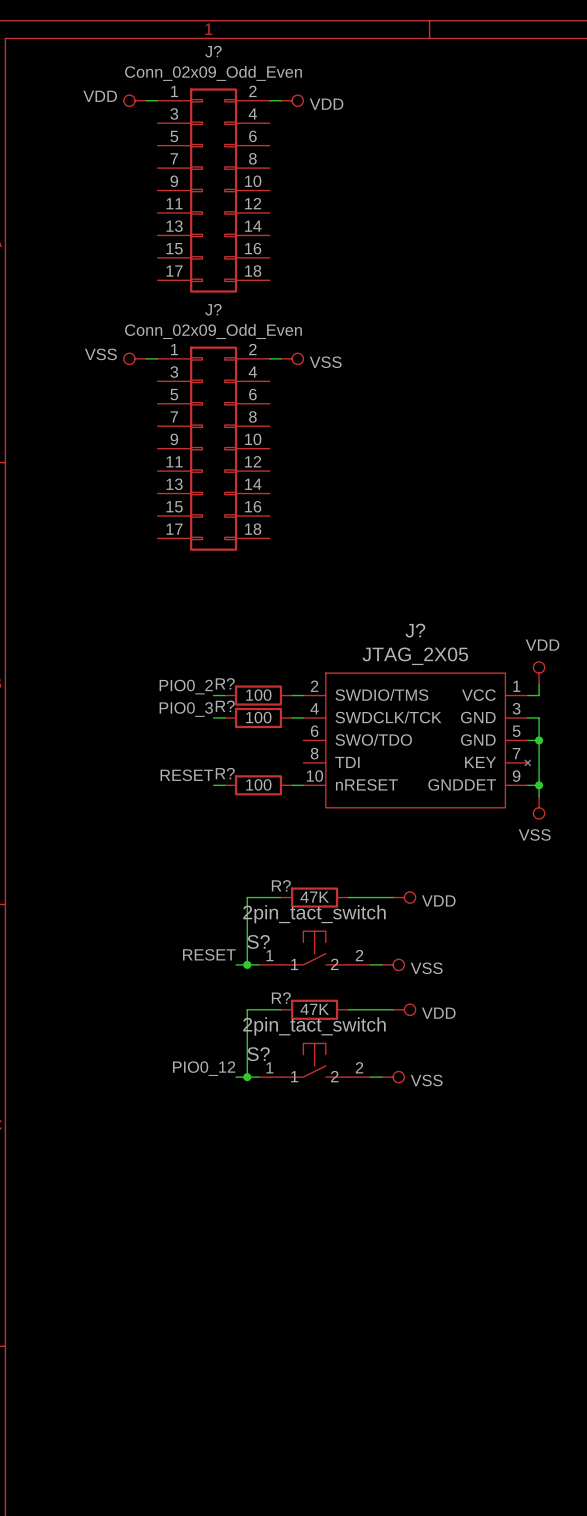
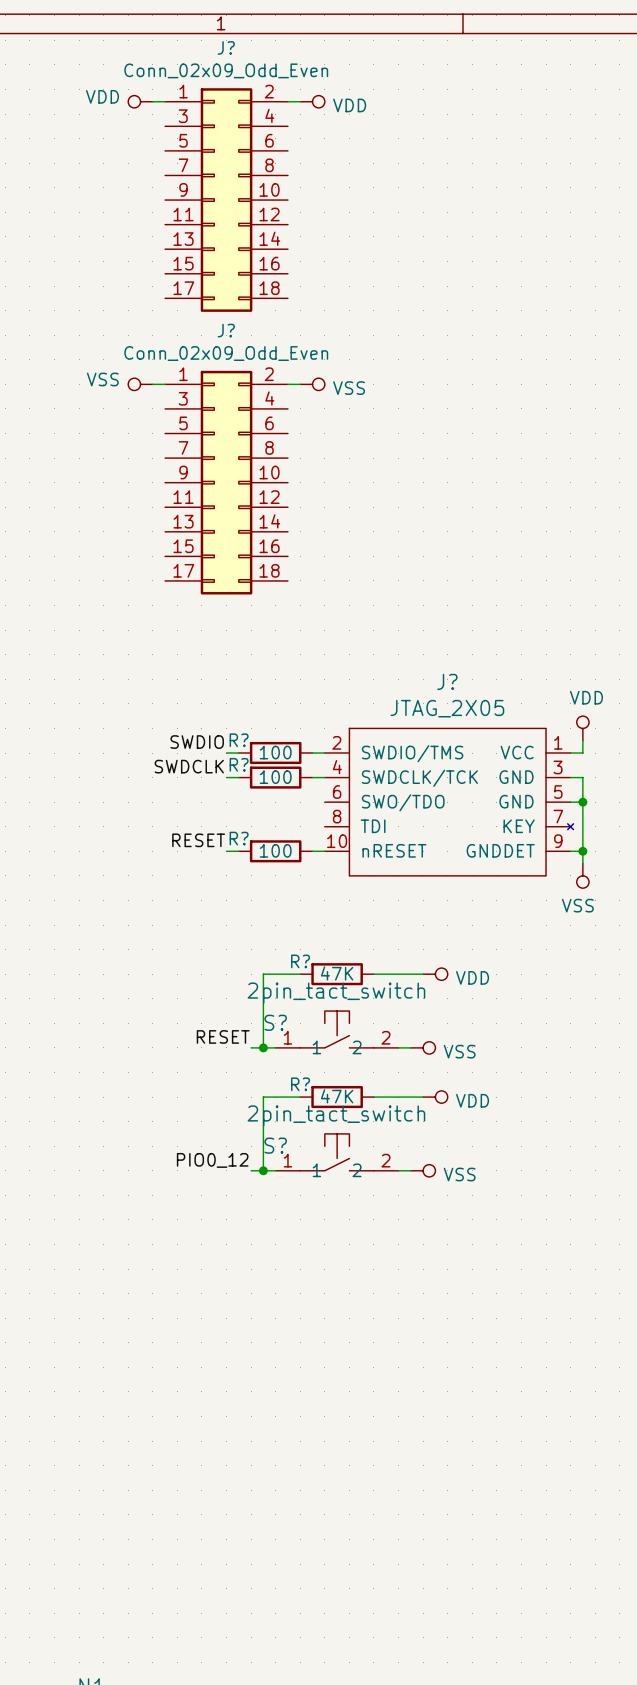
label: PIO0_2 (186, 687) -> SWDIO (197, 742)
label: PIO0_3 (186, 709) -> SWDCLK (189, 766)

